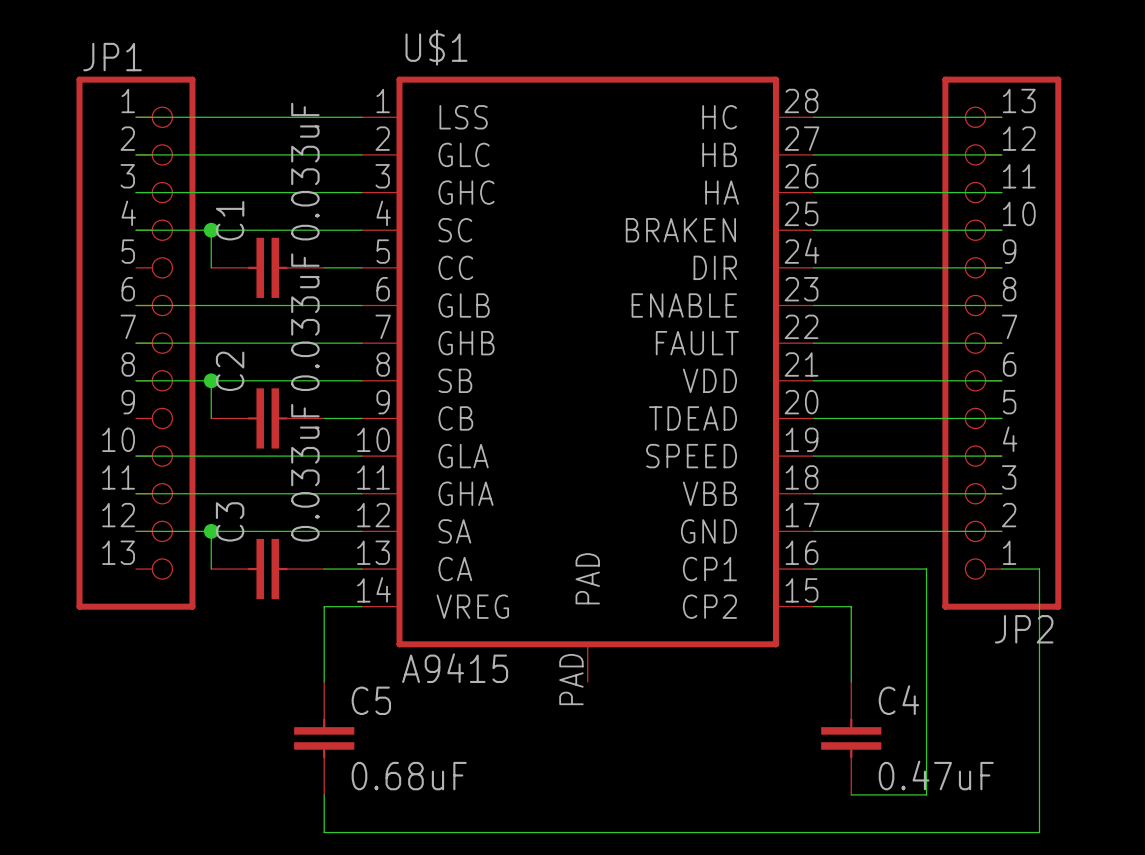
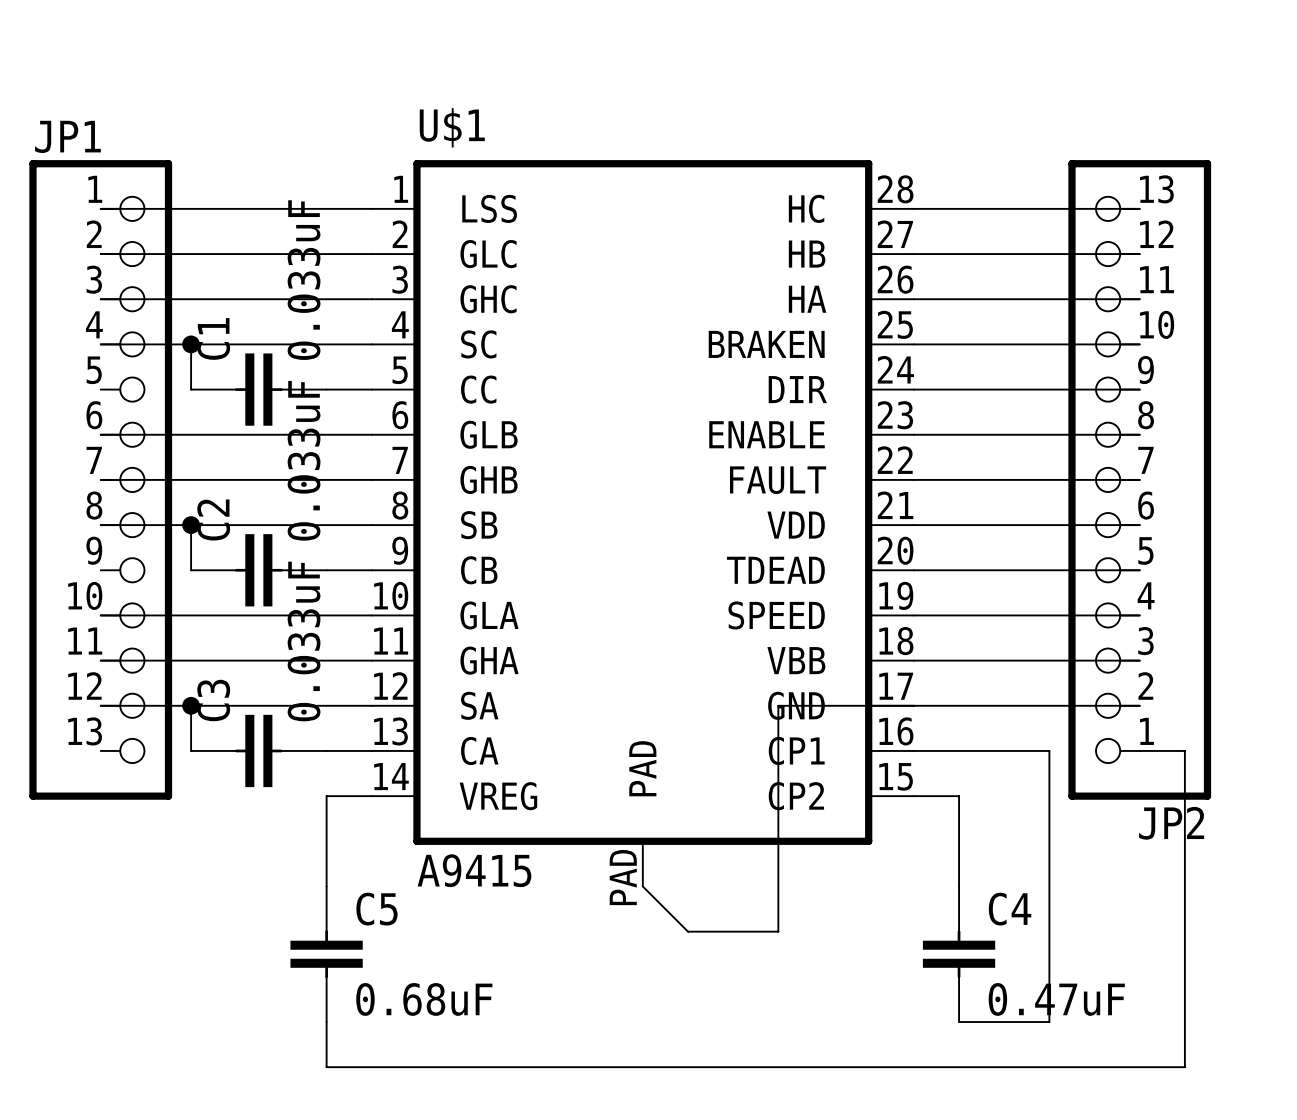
wire: none -> (913, 705) (778, 705) (778, 931) (688, 931) (642, 886)

